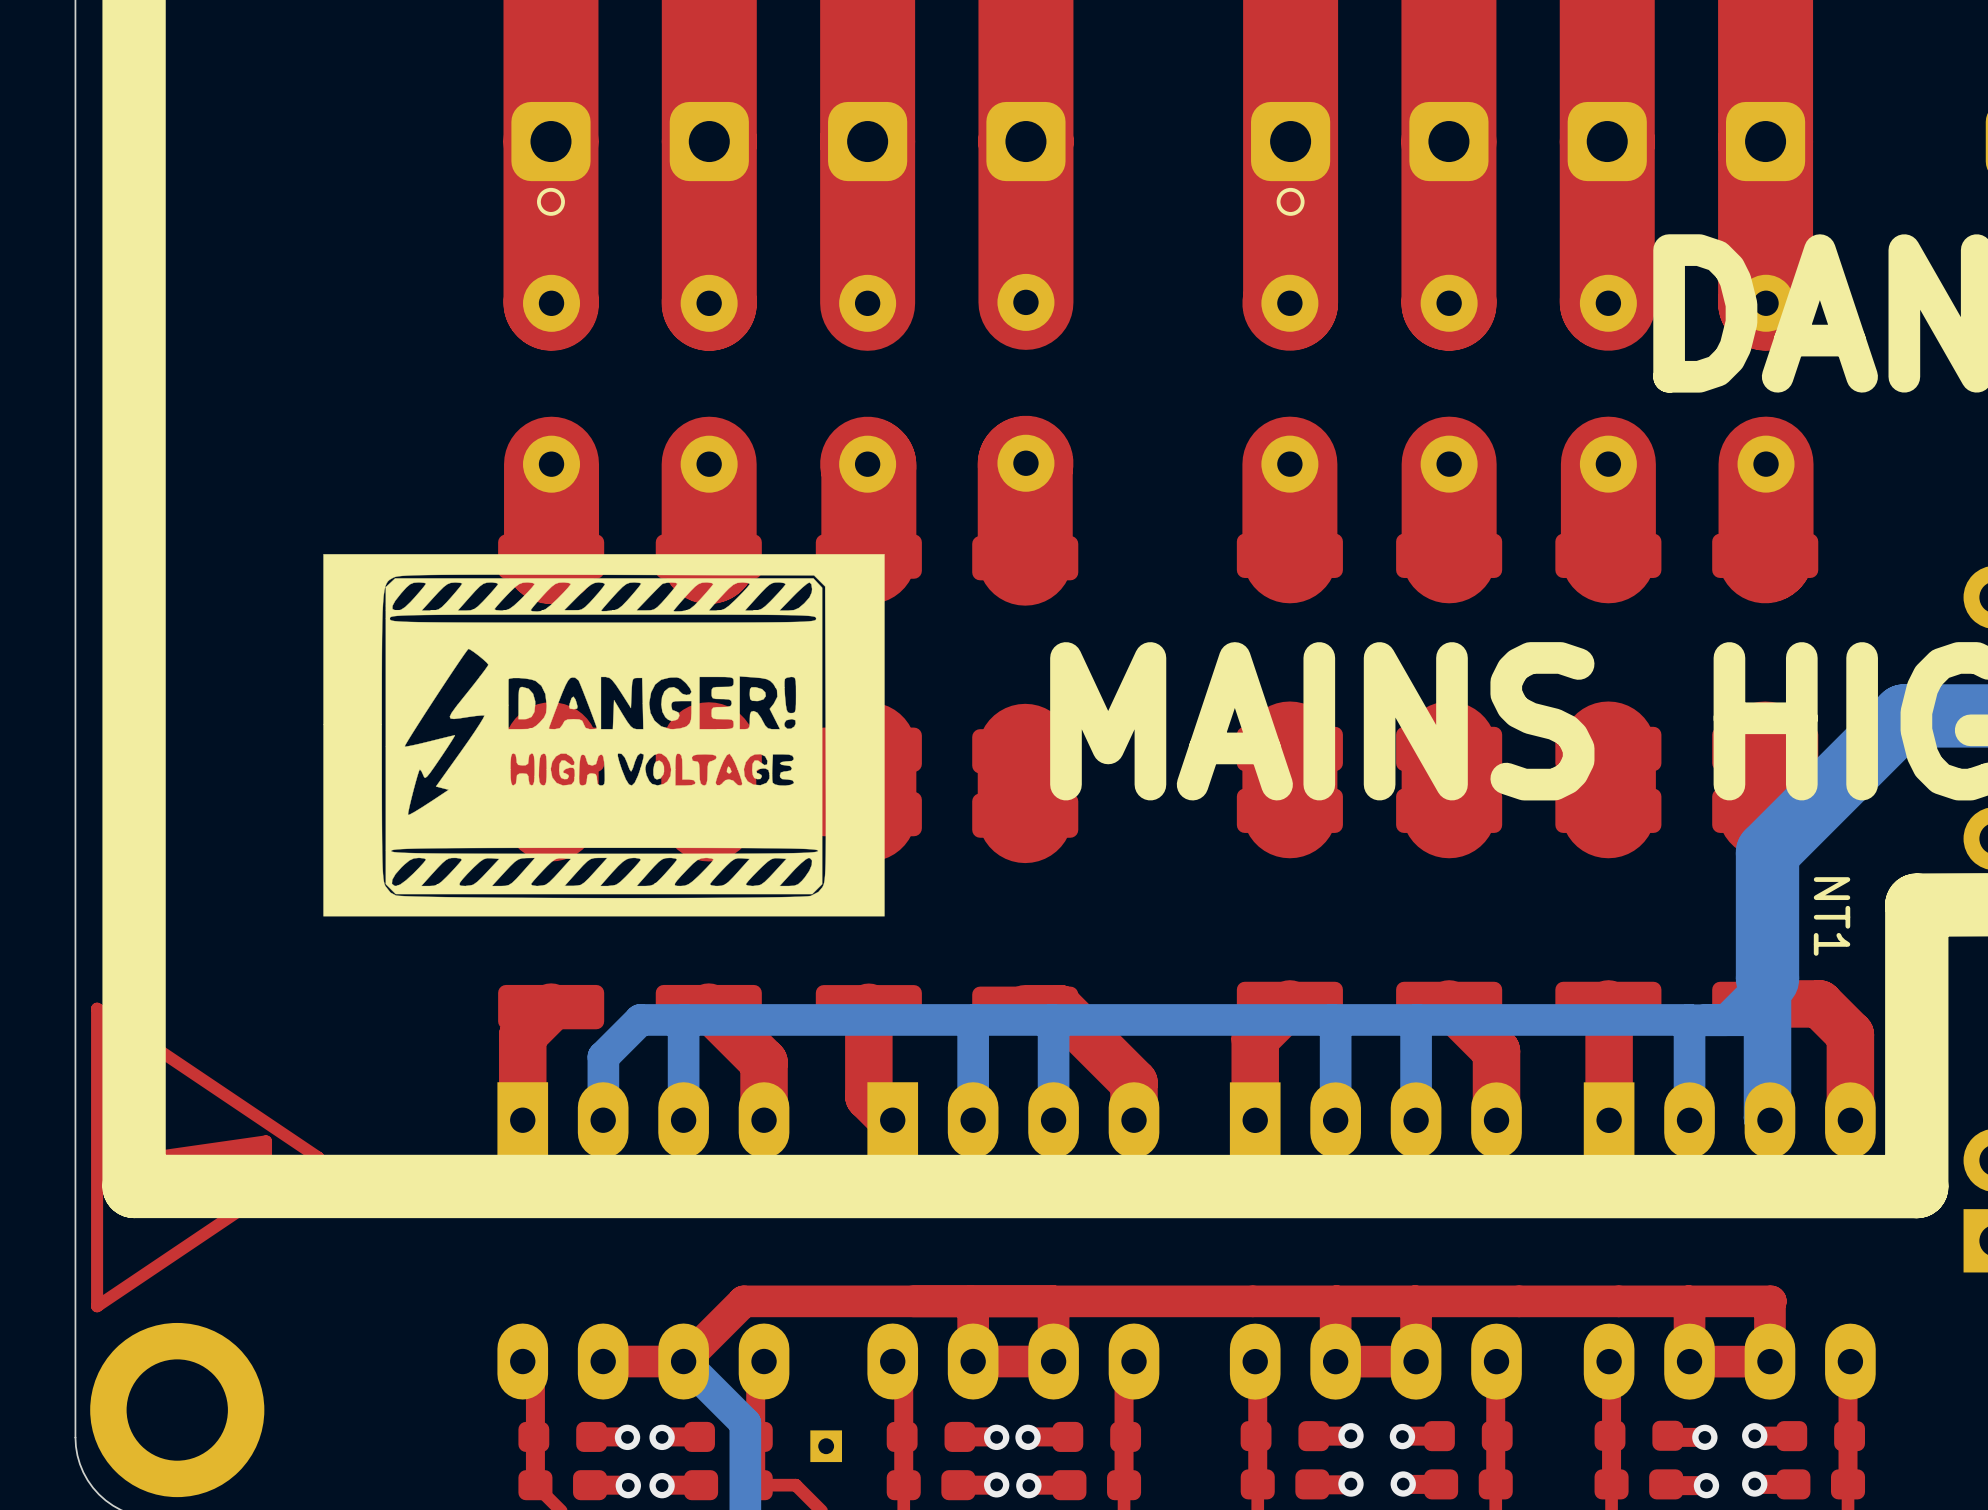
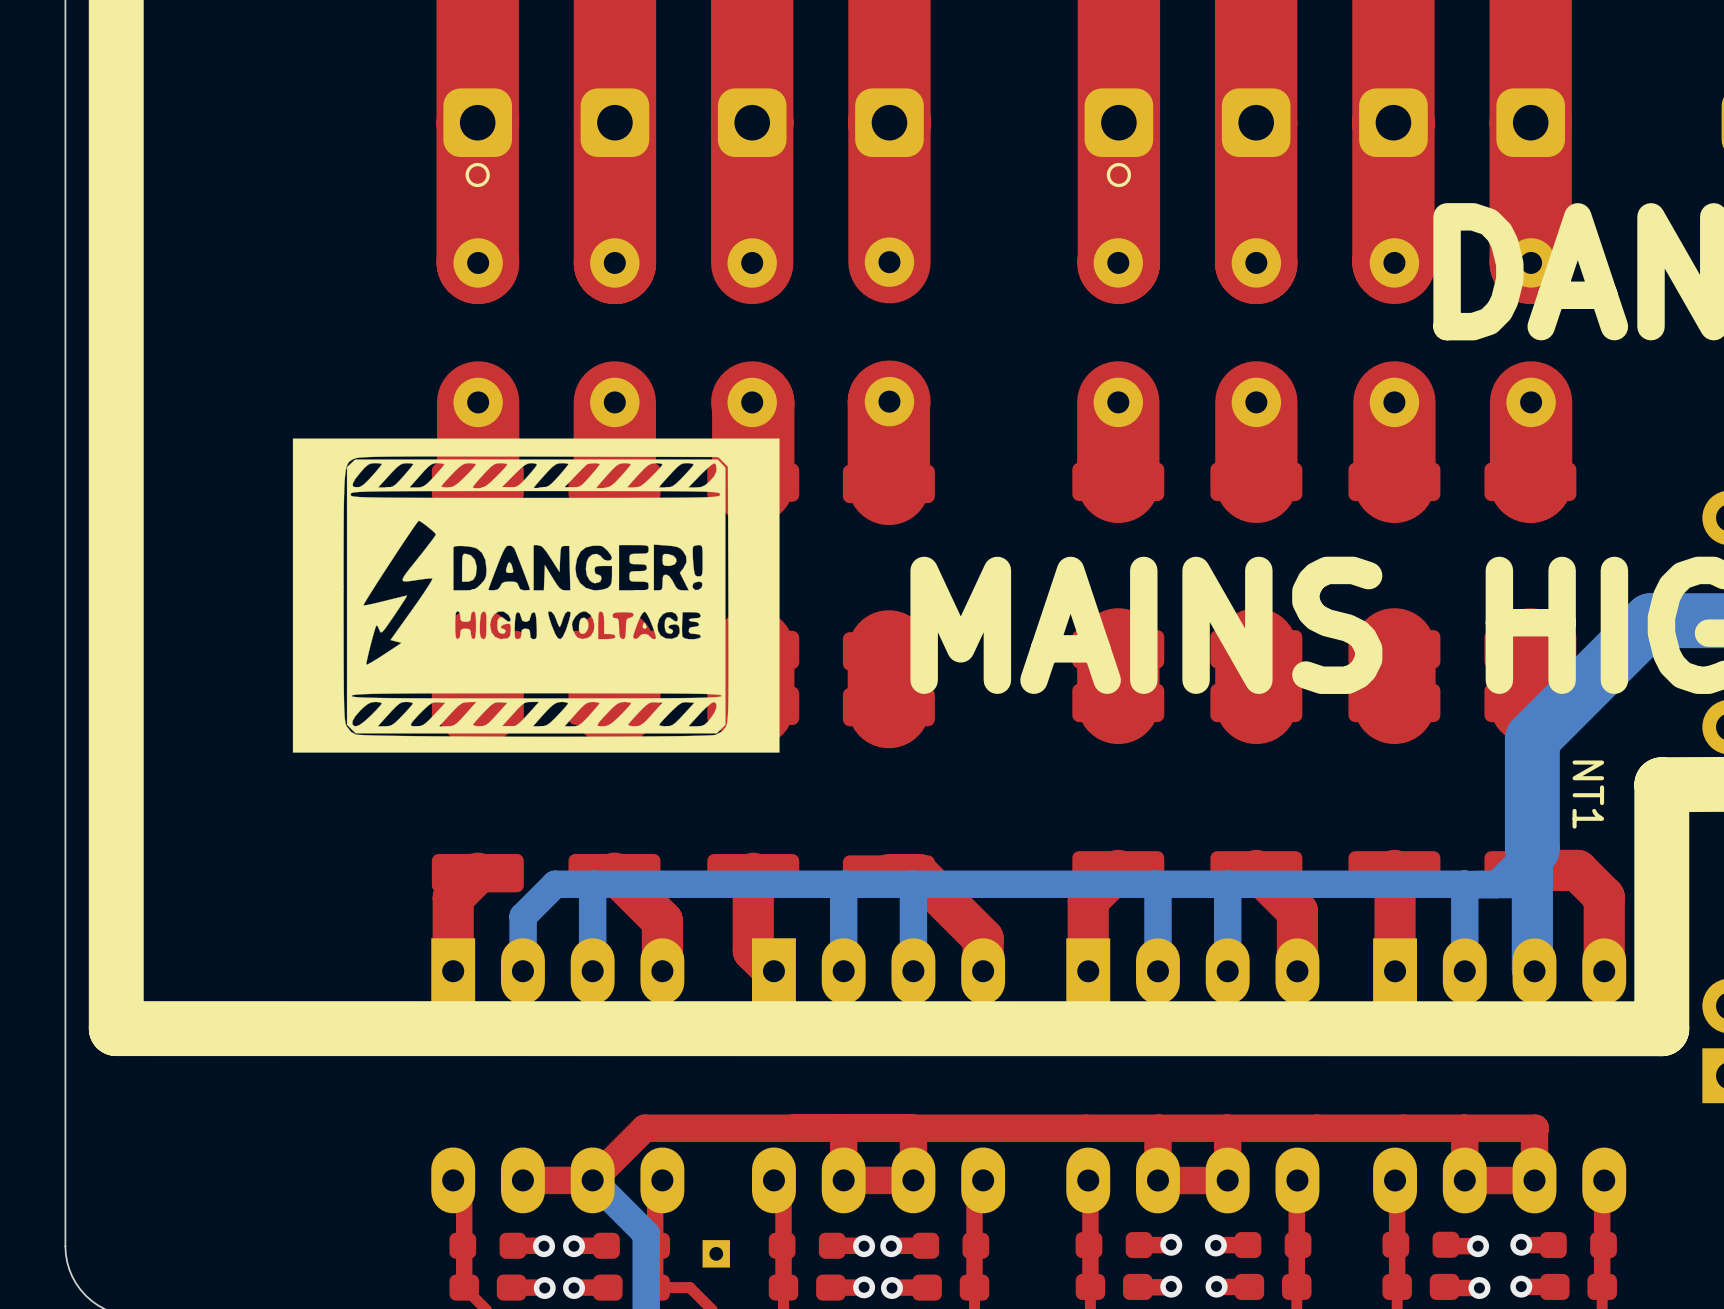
drawing position: (603, 735) -> (536, 595)
drawing: [91, 1002, 325, 1313] -> none
part: (177, 1410) -> none

